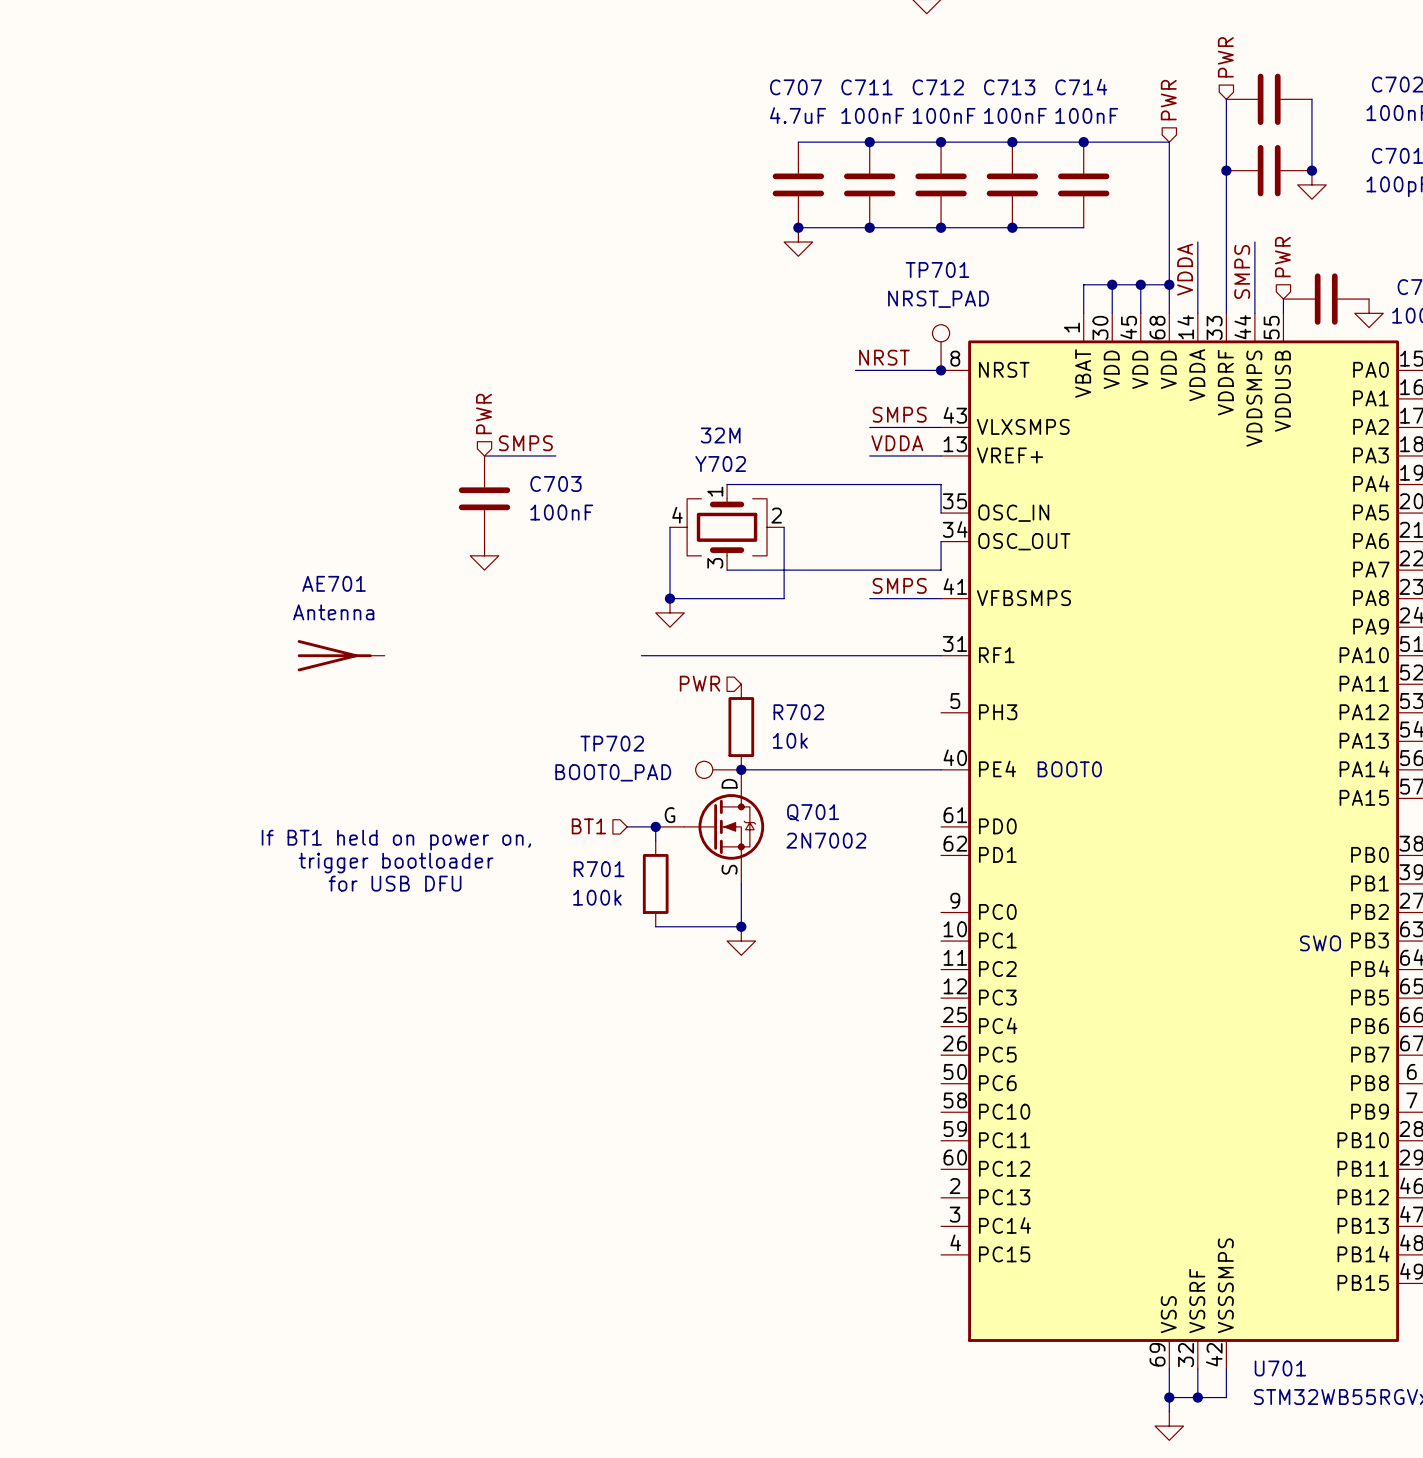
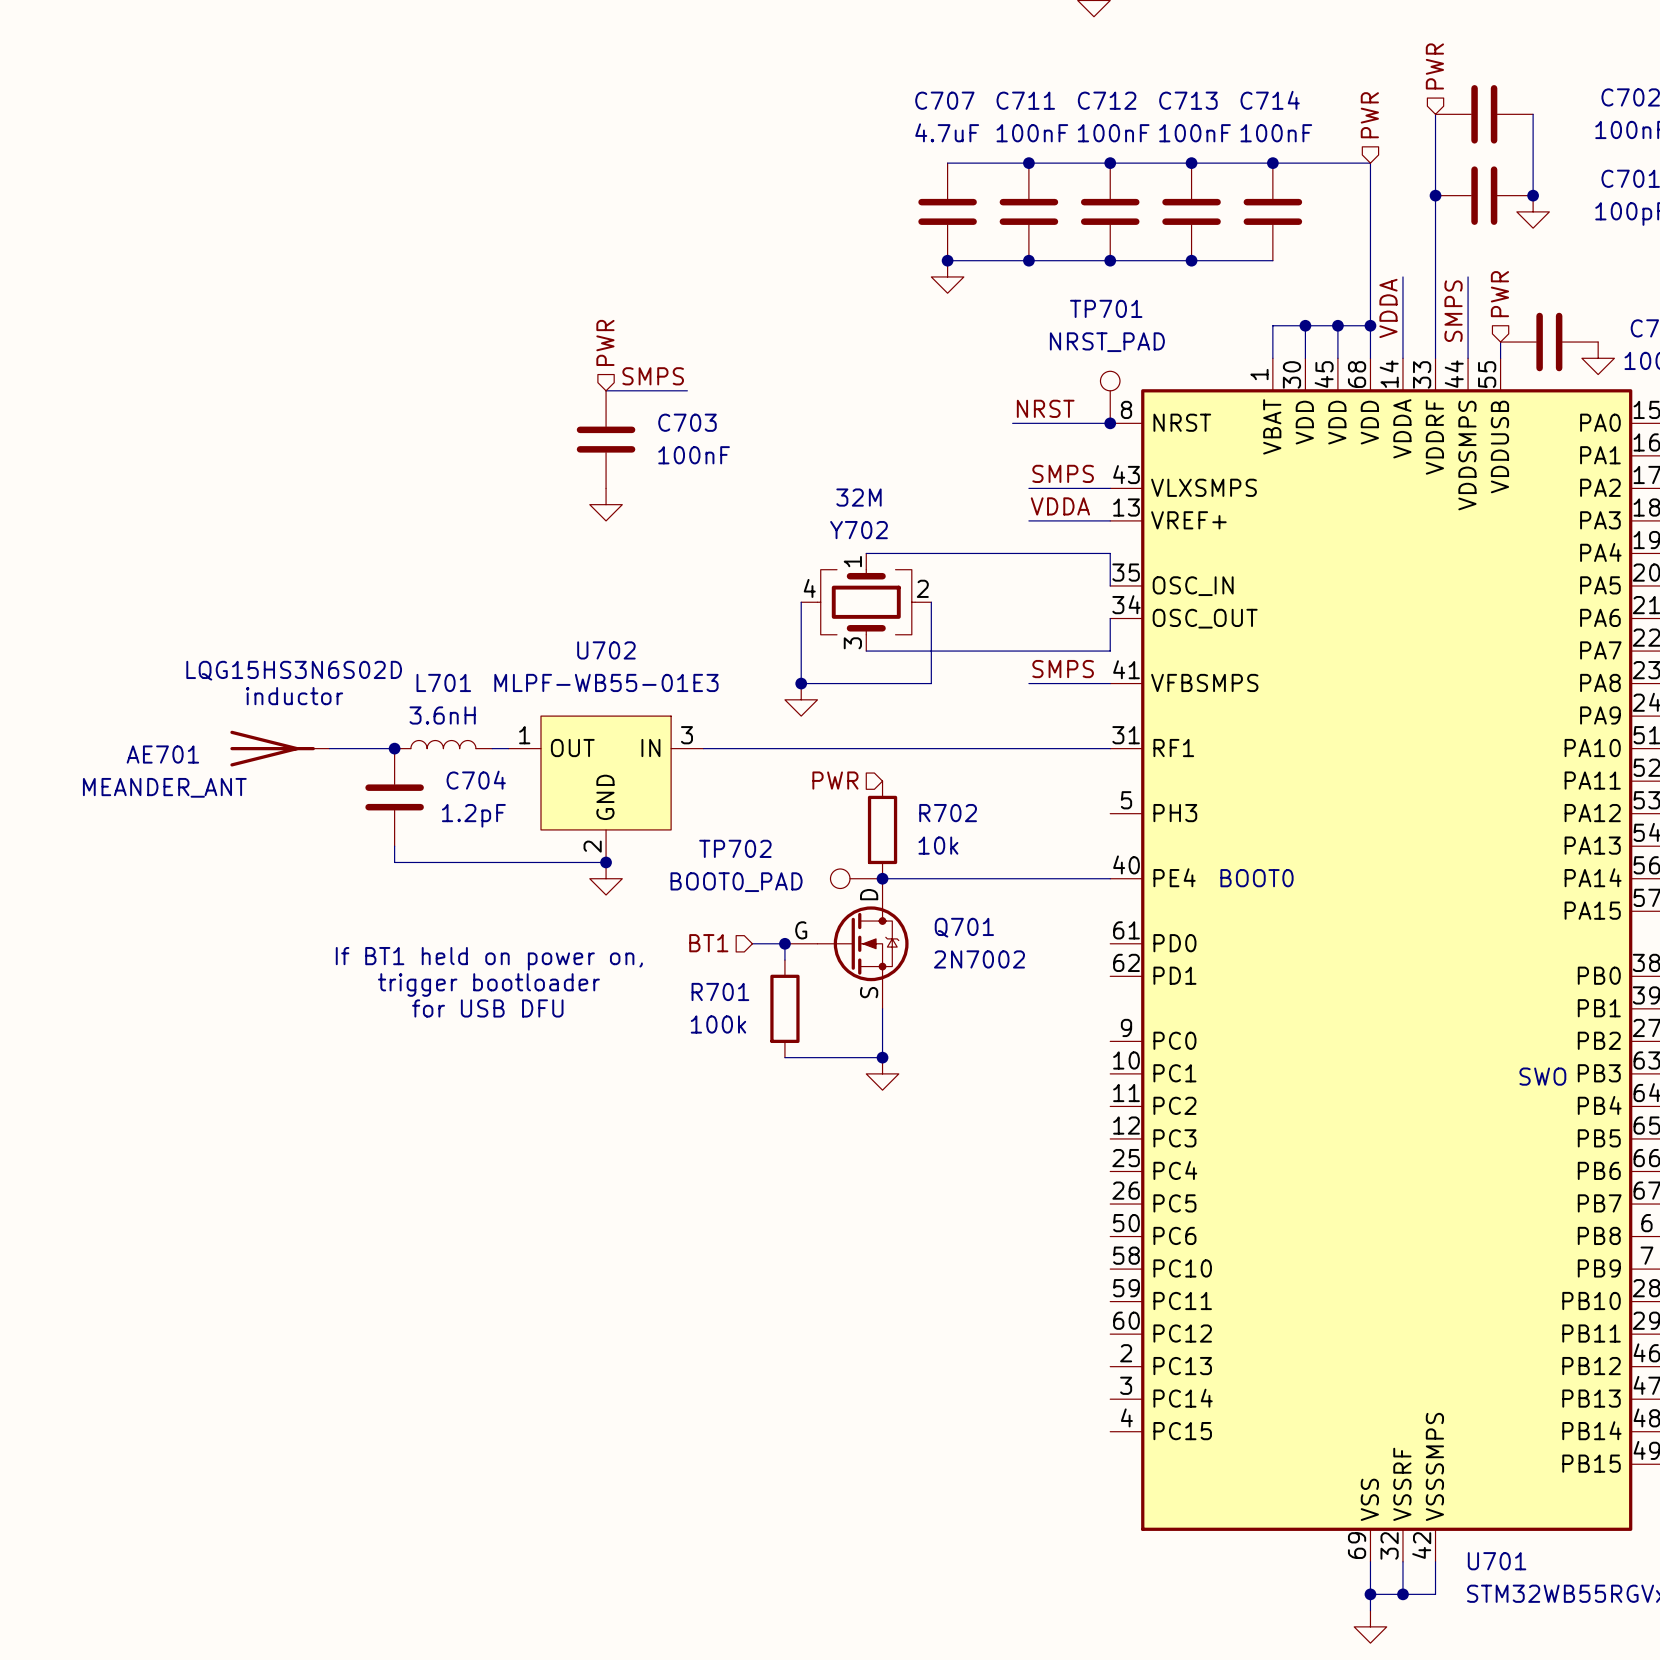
hierarchical label position: PWR (483, 413) -> PWR (605, 342)
power symbol: none -> (606, 504)
label position: SMPS (525, 443) -> SMPS (653, 376)
wire: (484, 455) (555, 455) -> (606, 390) (687, 390)
C703 position: (484, 498) -> (606, 439)
power symbol: (484, 555) -> none
AE701 name position: AE701 (334, 583) -> AE701 (162, 754)
text: none -> LQG15HS3N6S02D (294, 670)
text: none -> inductor (294, 696)
AE701 value: Antenna (333, 612) -> MEANDER_ANT (164, 787)
L701: none -> 3.6nH (443, 744)
wire: none -> (329, 748) (394, 748)
junction: none -> (394, 748)
AE701 position: (341, 655) -> (279, 748)
wire: none -> (492, 748) (508, 748)
wire: none -> (703, 748) (768, 748)
U702: none -> MLPF-WB55-01E3 (606, 789)
C704: none -> 1.2pF (394, 797)
wire: none -> (394, 846) (394, 862) (606, 862)
junction: none -> (606, 862)
power symbol: none -> (606, 878)

